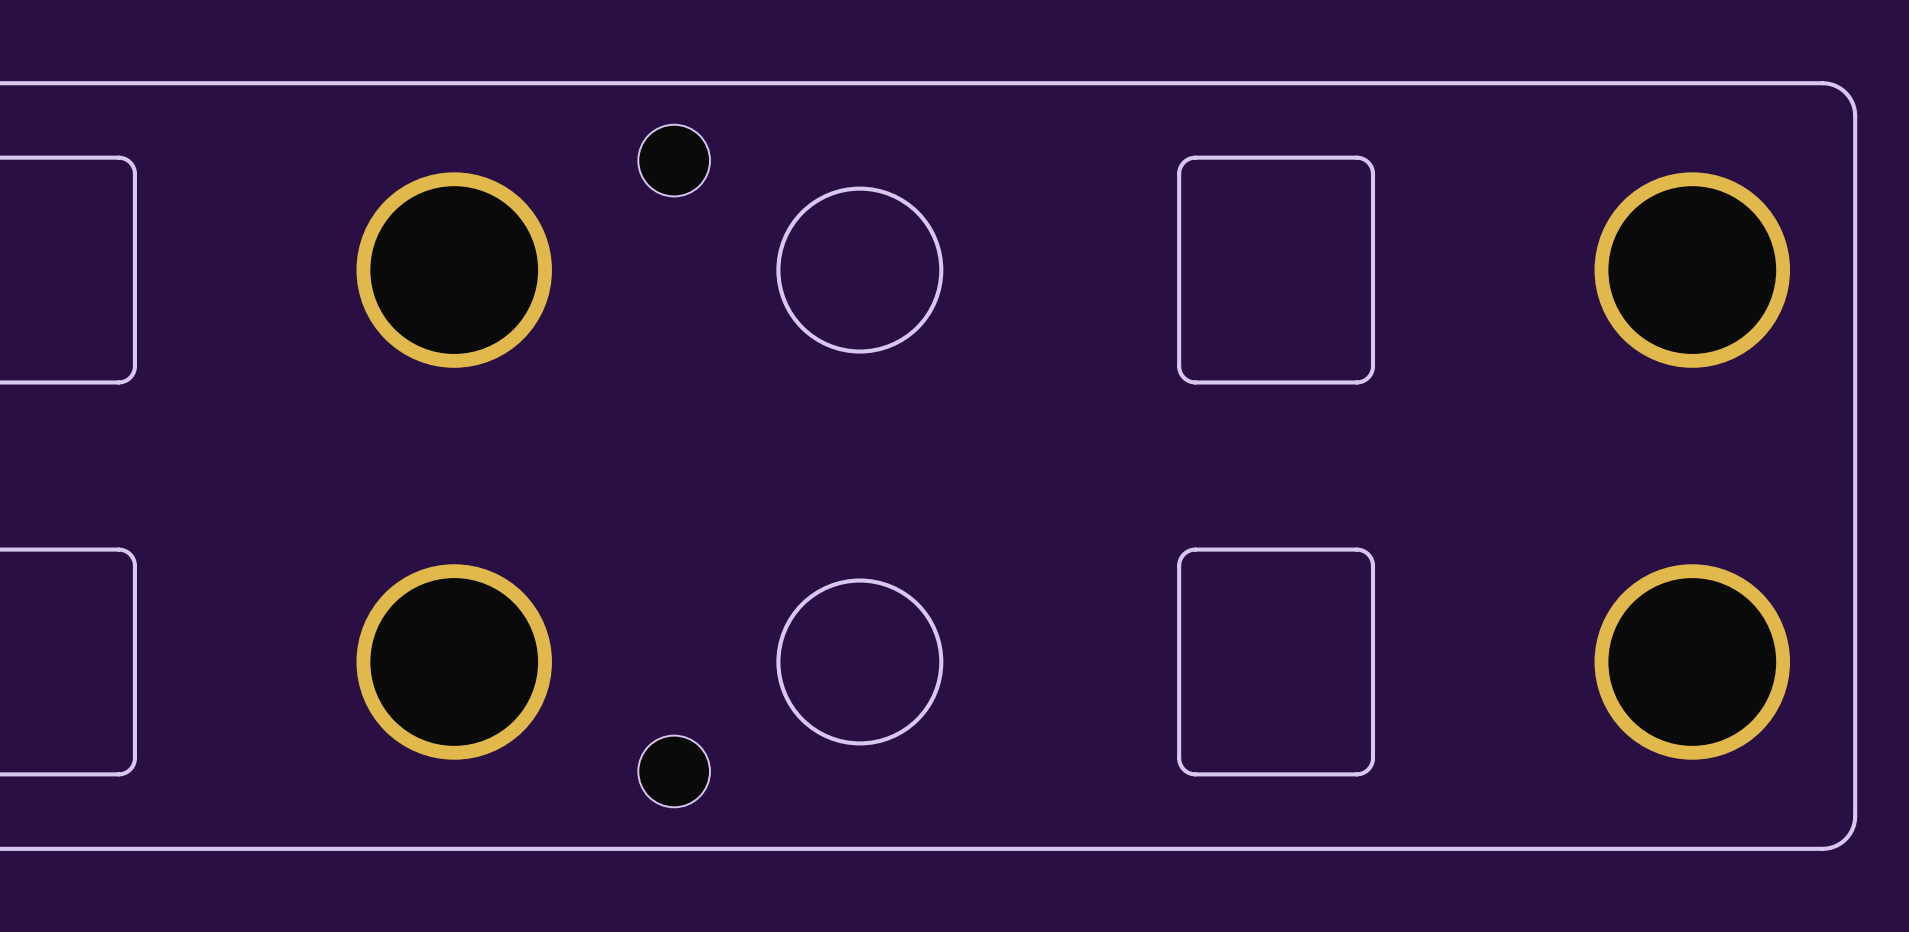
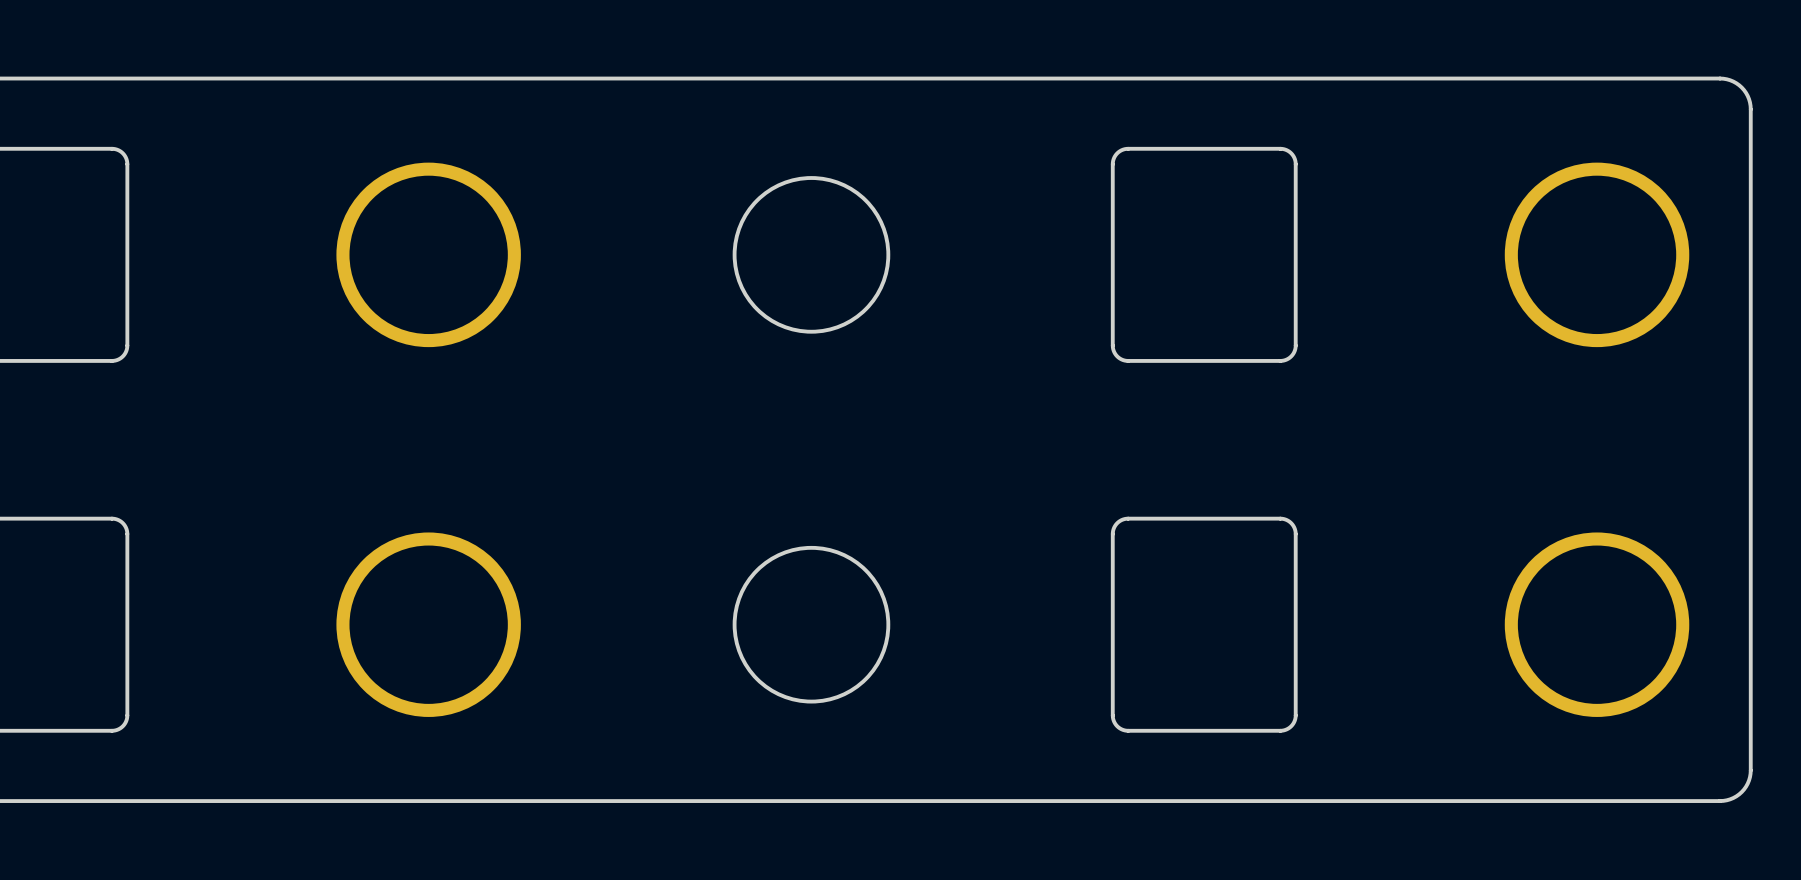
part: (674, 160) -> none
part: (674, 771) -> none

